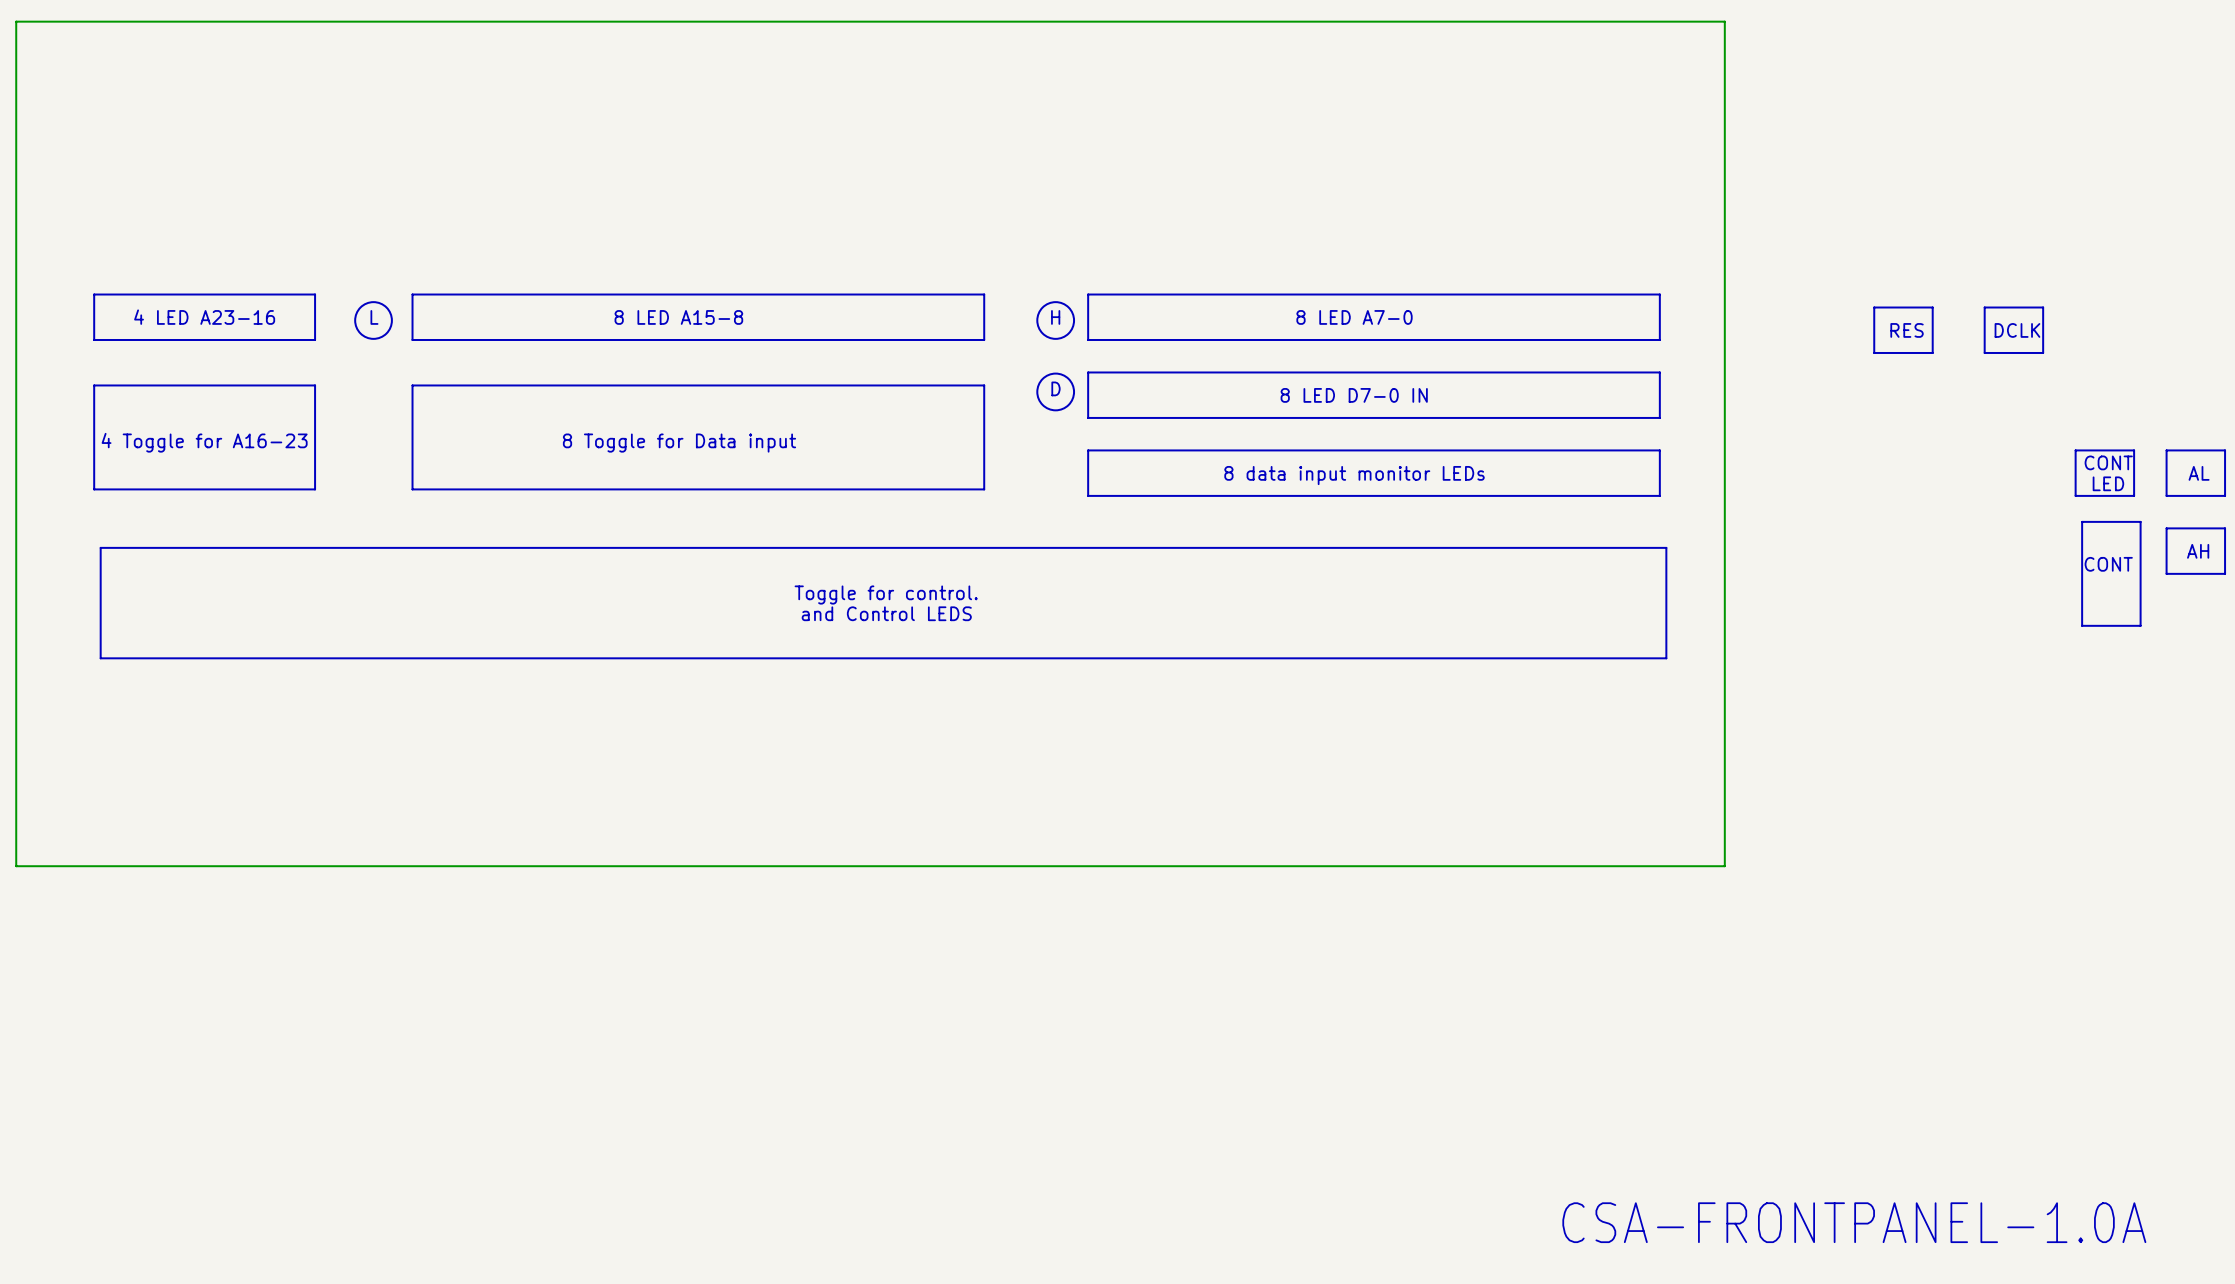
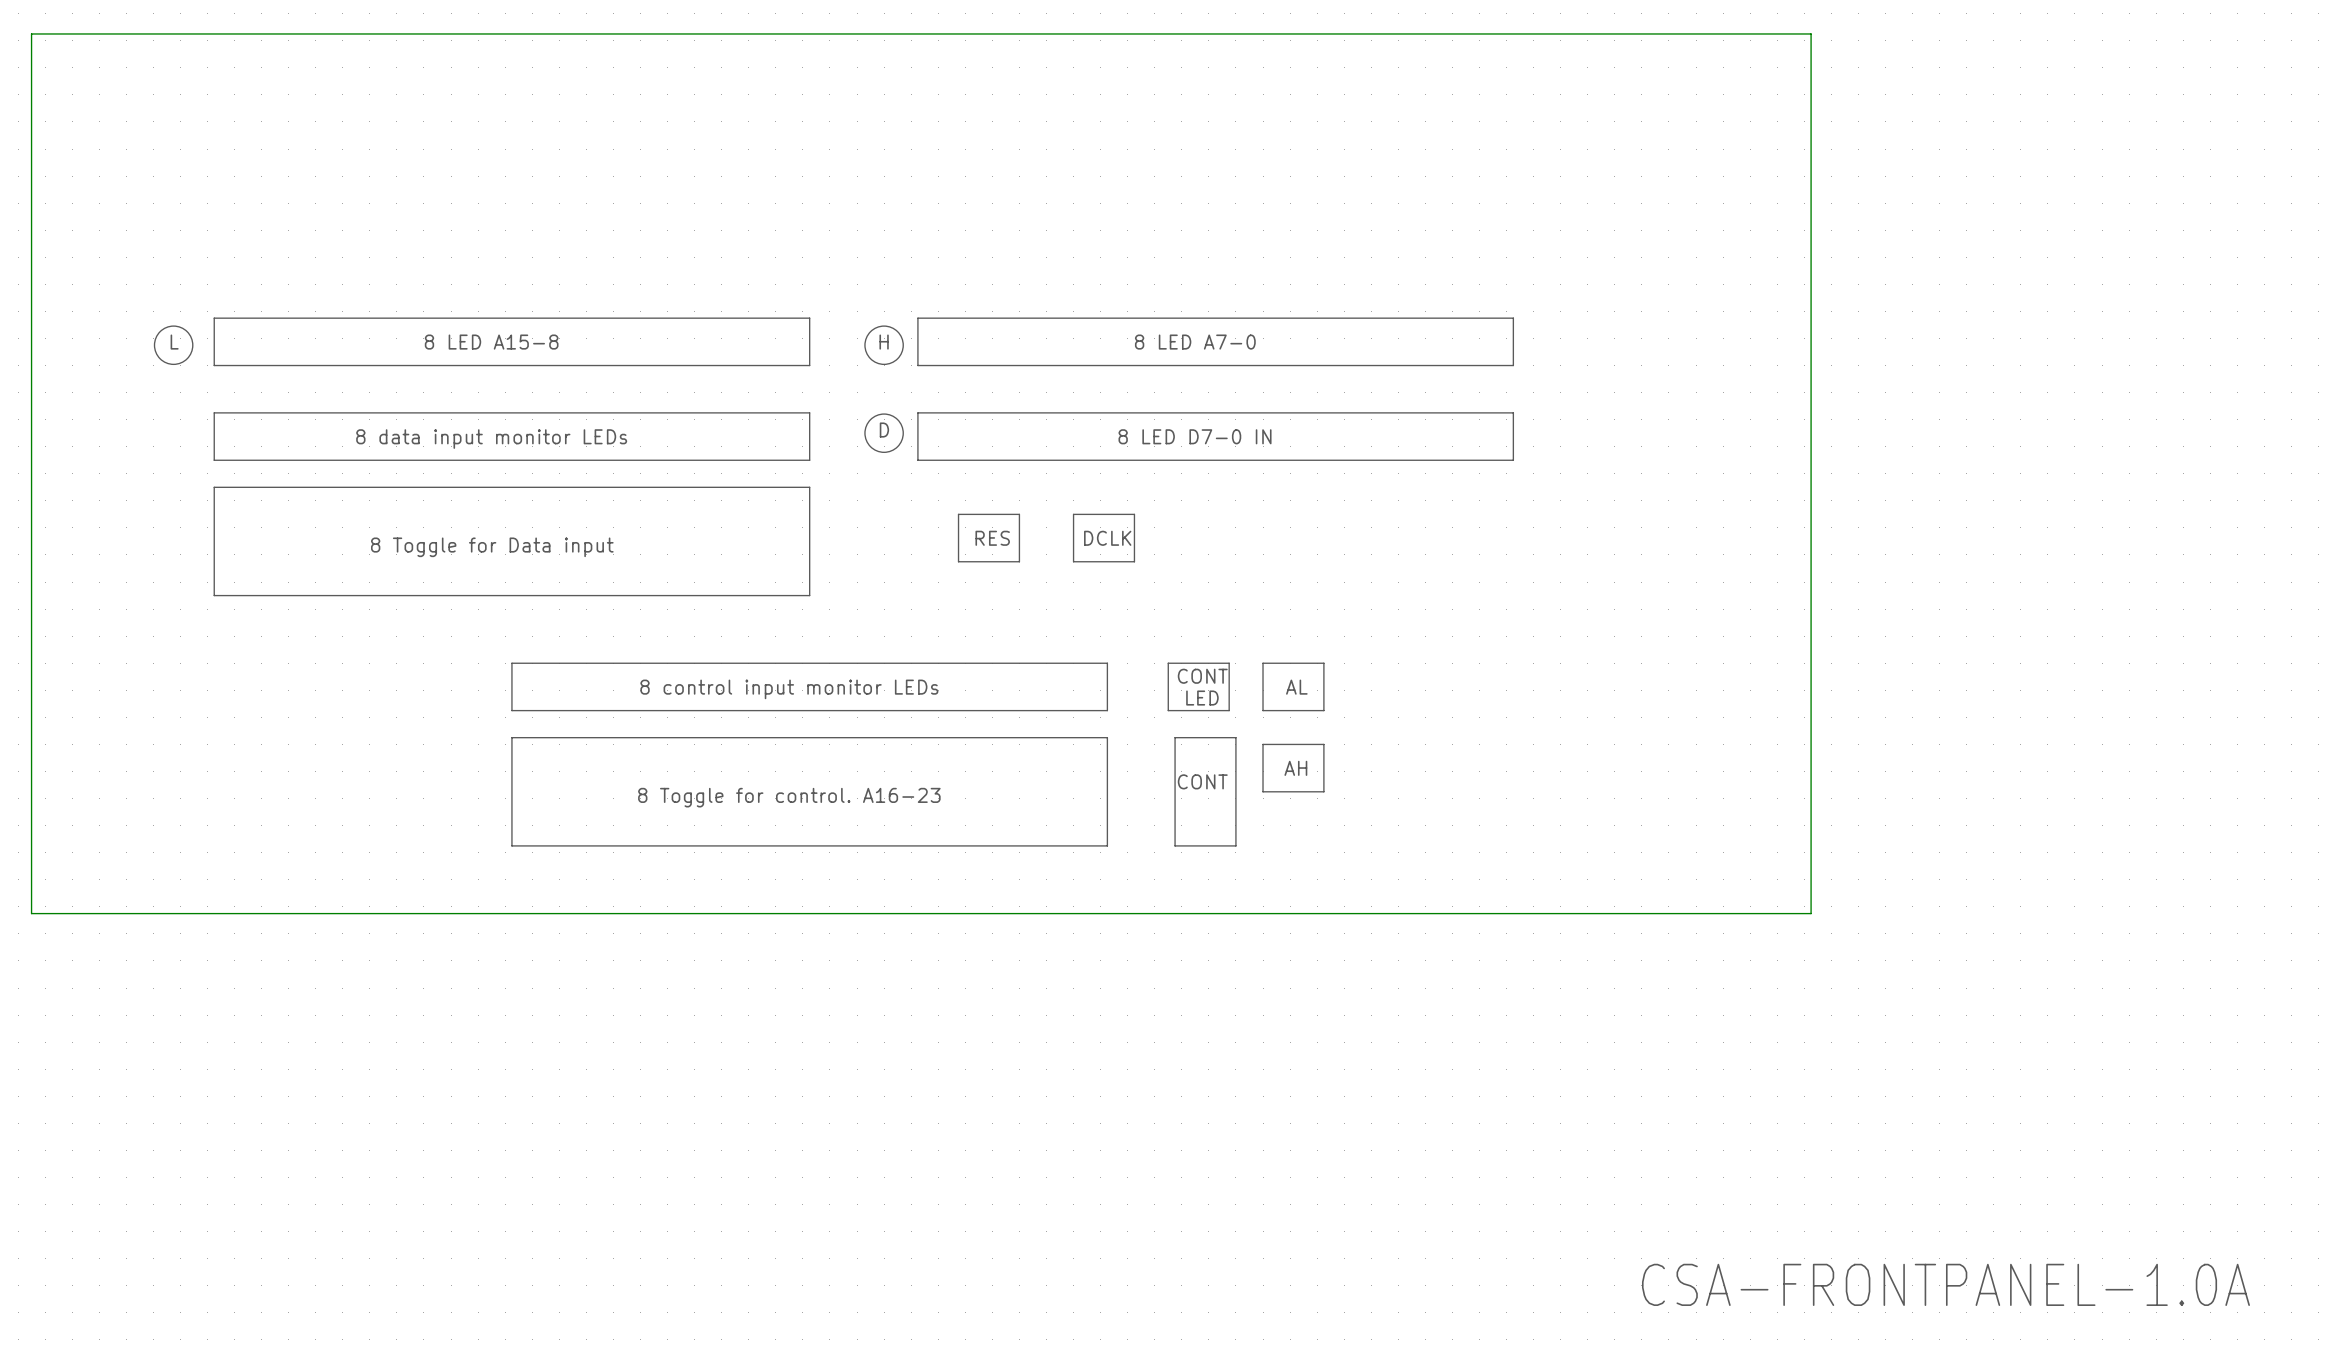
line: (191, 294) (94, 294) (94, 339) (191, 339) -> (214, 318) (214, 365)
line: (315, 294) (315, 339) -> (342, 318) (444, 318)
line: (412, 294) (412, 339) -> (342, 365) (444, 365)
line: (763, 294) (867, 294) -> (809, 318) (809, 365)
line: (984, 294) (984, 339) -> (1039, 318) (1147, 318)
line: (1088, 294) (1088, 339) -> (1039, 365) (1147, 365)
line: (1438, 294) (1659, 294) (1659, 339) (1438, 339) -> (1513, 318) (1513, 365)
drawing: none -> [864, 326, 904, 365]
drawing: [1037, 302, 1075, 339] -> none
line: (1874, 307) (1932, 307) (1932, 352) (1874, 352) (1874, 307) -> none
line: (1984, 307) (2043, 307) (2043, 352) (1984, 352) (1984, 307) -> none
text: 4 LED A23-16 (204, 317) -> none
text position: L (374, 317) -> L (174, 342)
text position: 8 LED A15-8 (678, 317) -> 8 LED A15-8 (491, 342)
text position: H (1055, 317) -> H (884, 342)
text position: 8 LED A7-0 (1354, 317) -> 8 LED A7-0 (1195, 342)
drawing position: (373, 320) -> (173, 345)
text: RES (1907, 330) -> none
text: DCLK (2017, 330) -> none
line: (763, 339) (867, 339) -> (917, 318) (917, 365)
line: (1088, 372) (1088, 417) (1659, 417) (1659, 372) (1088, 372) -> none
drawing: [1037, 373, 1075, 411] -> none
line: (191, 385) (94, 385) (94, 489) (315, 489) (315, 385) -> (444, 412) (342, 412)
line: none -> (214, 412) (214, 460) (809, 460) (809, 412)
line: (412, 385) (412, 489) (984, 489) (984, 385) -> none
line: (763, 385) (867, 385) -> (1039, 412) (1513, 412) (1513, 460) (917, 460) (917, 412)
drawing: none -> [864, 414, 904, 453]
text position: D (1055, 388) -> D (884, 430)
text position: 8 LED D7-0 IN (1354, 395) -> 8 LED D7-0 IN (1195, 436)
text: none -> 8 data input monitor LEDs (491, 439)
text: 4 Toggle for A16-23 (204, 442) -> none
text position: 8 Toggle for Data input (679, 443) -> 8 Toggle for Data input (492, 547)
line: (1088, 450) (1659, 450) (1659, 495) (1088, 495) (1088, 450) -> none
line: (2075, 450) (2134, 450) (2134, 495) (2075, 495) (2075, 450) -> none
line: (2166, 450) (2225, 450) (2225, 495) (2166, 495) (2166, 450) -> none
line: none -> (214, 487) (214, 595) (809, 595) (809, 487) (214, 487)
text: CONT (2108, 462) -> none
text: AL (2199, 473) -> none
text: 8 data input monitor LEDs (1354, 475) -> none
line: none -> (958, 514) (1019, 514) (1019, 561) (958, 561) (958, 514)
line: none -> (1073, 514) (1134, 514) (1134, 561) (1073, 561) (1073, 514)
text: LED (2108, 483) -> none
text: none -> RES (992, 538)
text: none -> DCLK (1107, 538)
line: (2082, 521) (2140, 521) (2140, 625) (2082, 625) (2082, 521) -> none
line: (2166, 528) (2166, 573) (2225, 573) (2225, 528) (2166, 528) -> none
line: (100, 547) (1666, 547) (1666, 658) (100, 658) (100, 547) -> none
text: AH (2198, 551) -> none
text: CONT (2108, 564) -> none
text: Toggle for control. (886, 595) -> none
text: and Control LEDS (886, 613) -> none
line: none -> (511, 663) (1107, 663) (1107, 710) (511, 710) (511, 663)
line: none -> (1168, 663) (1229, 663) (1229, 710) (1168, 710) (1168, 663)
line: none -> (1263, 663) (1323, 663) (1323, 710) (1263, 710) (1263, 663)
text: none -> CONT (1202, 676)
text: none -> AL (1296, 687)
text: none -> 8 control input monitor LEDs (789, 689)
text: none -> LED (1202, 698)
line: none -> (511, 737) (1107, 737) (1107, 845) (511, 845) (511, 737)
line: none -> (1175, 737) (1235, 737) (1235, 845) (1175, 845) (1175, 737)
line: none -> (1263, 744) (1263, 791) (1323, 791) (1323, 744) (1263, 744)
text: none -> AH (1295, 768)
text: none -> CONT (1202, 781)
text: none -> 8 Toggle for control. A16-23 (789, 797)

